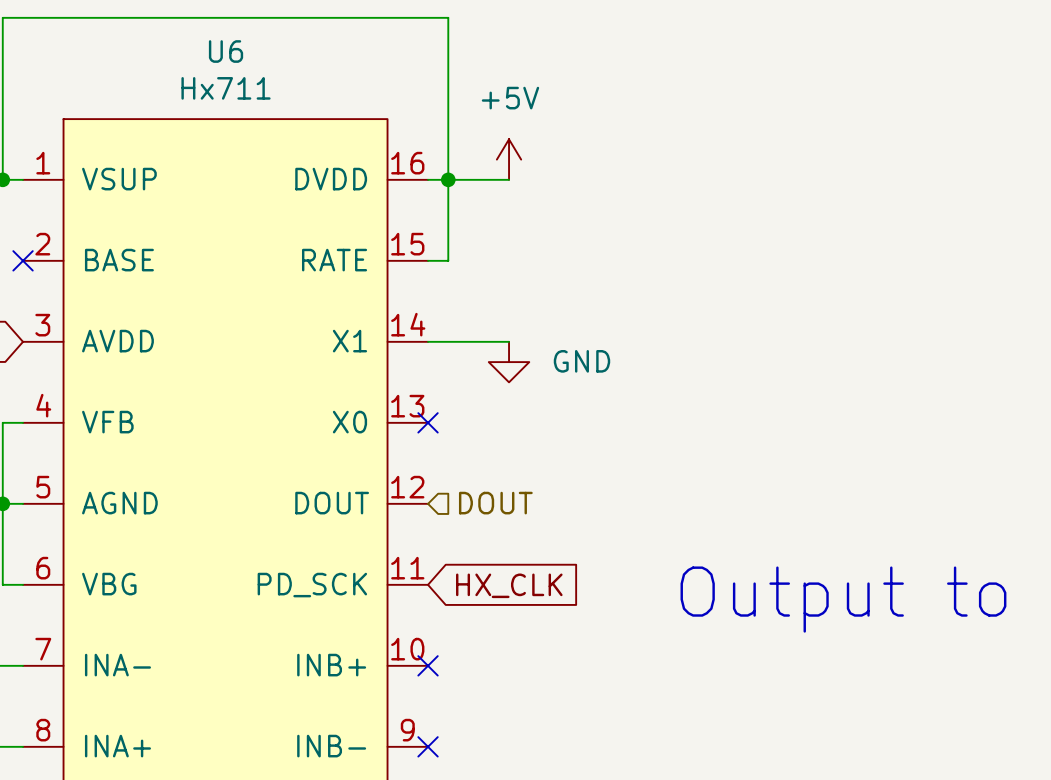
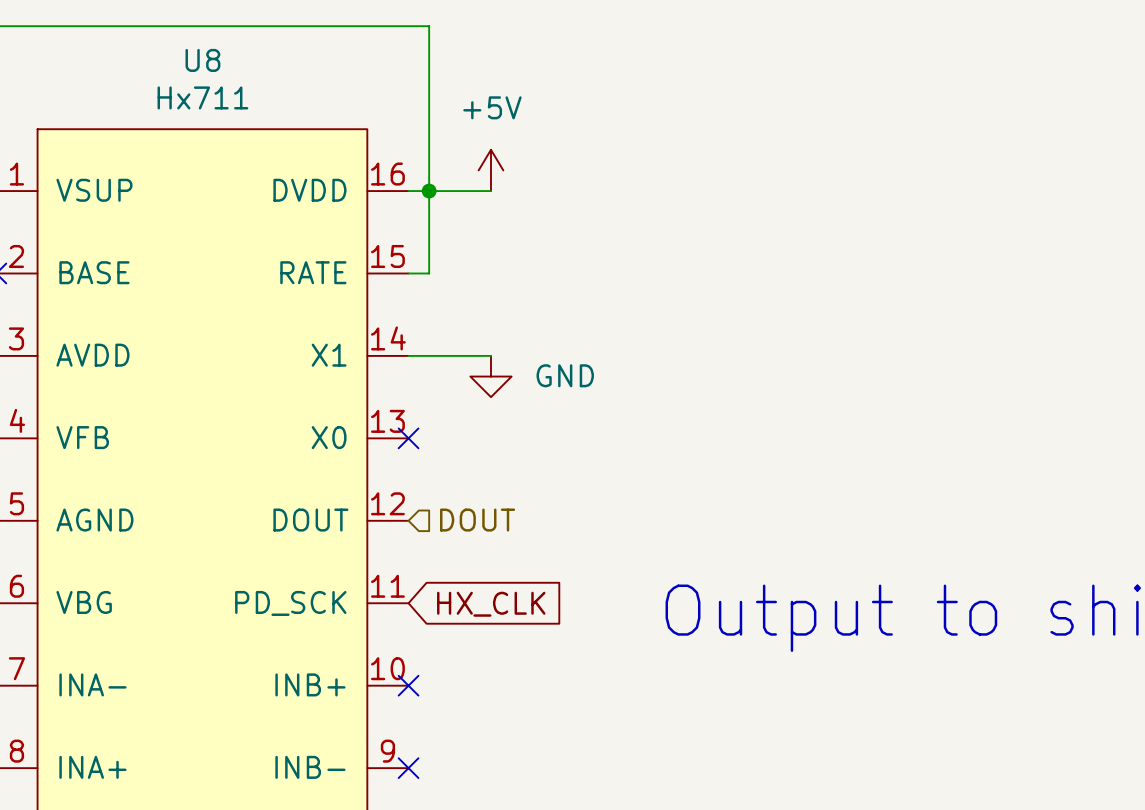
U6 name: U6 (226, 51) -> U8 (202, 60)

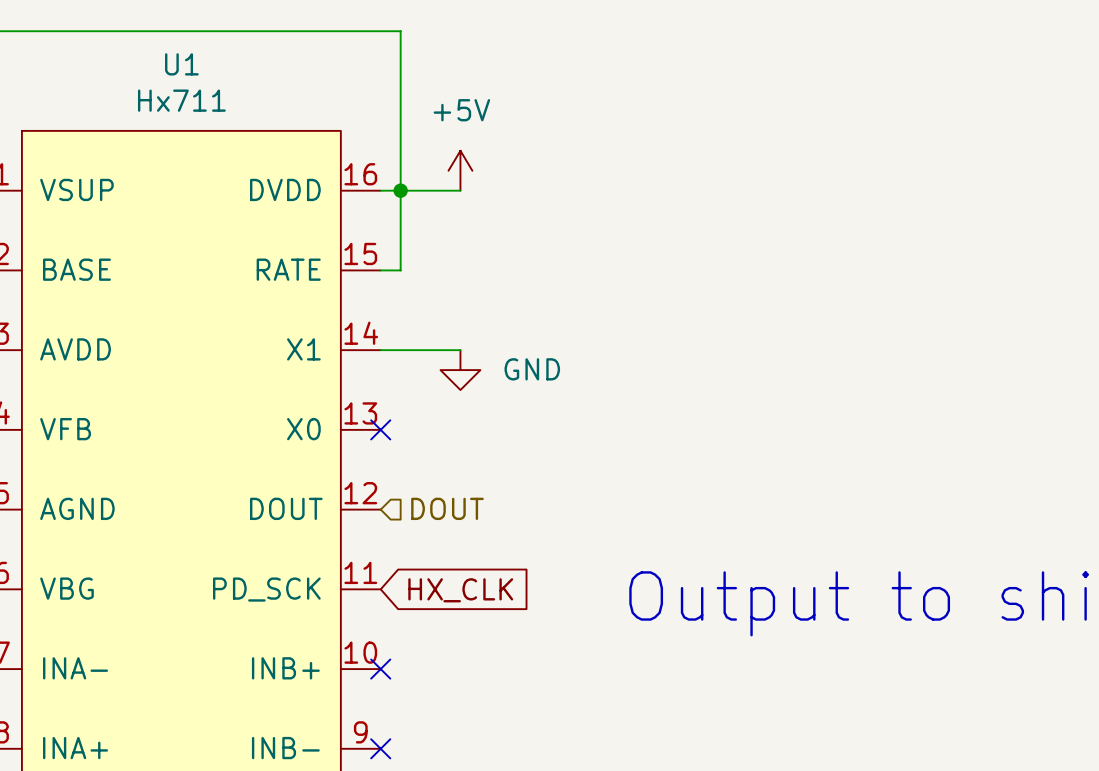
U8 name: U8 (202, 60) -> U1 (181, 64)

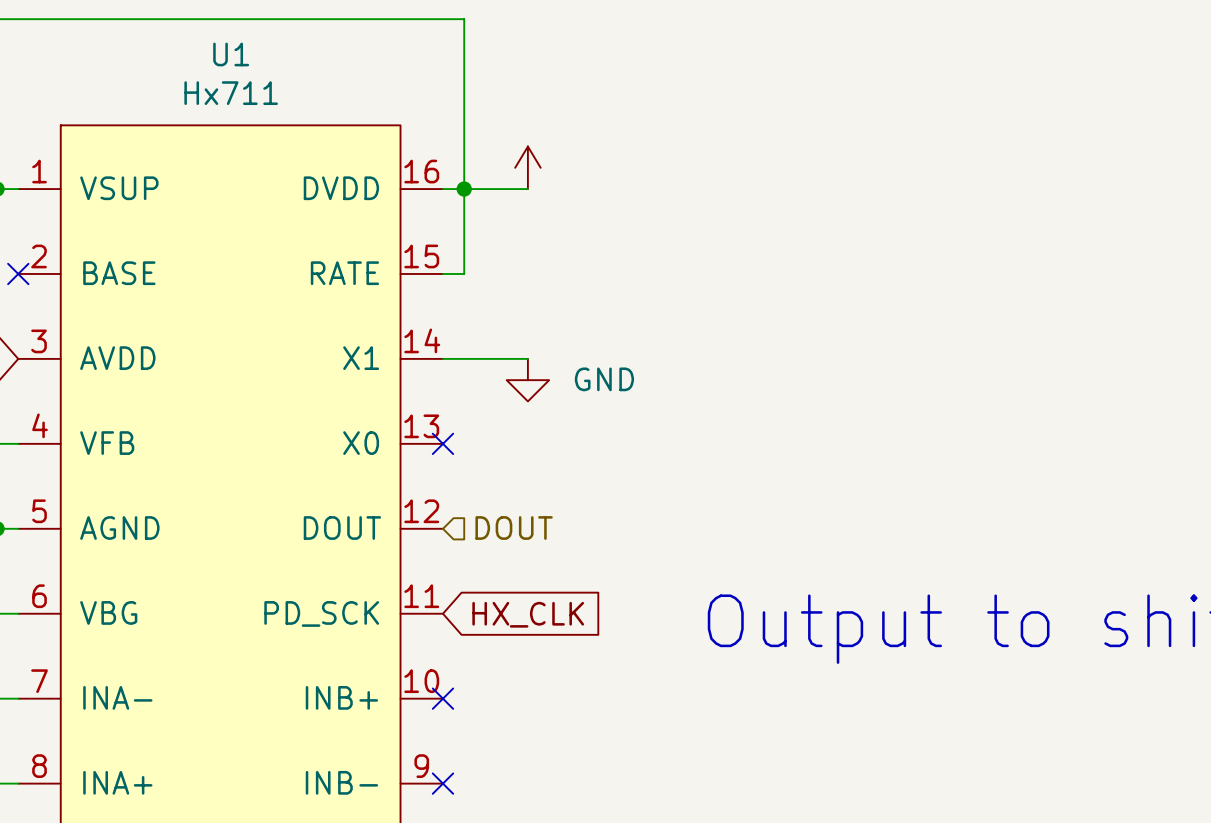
power symbol text: +5V (461, 110) -> none

